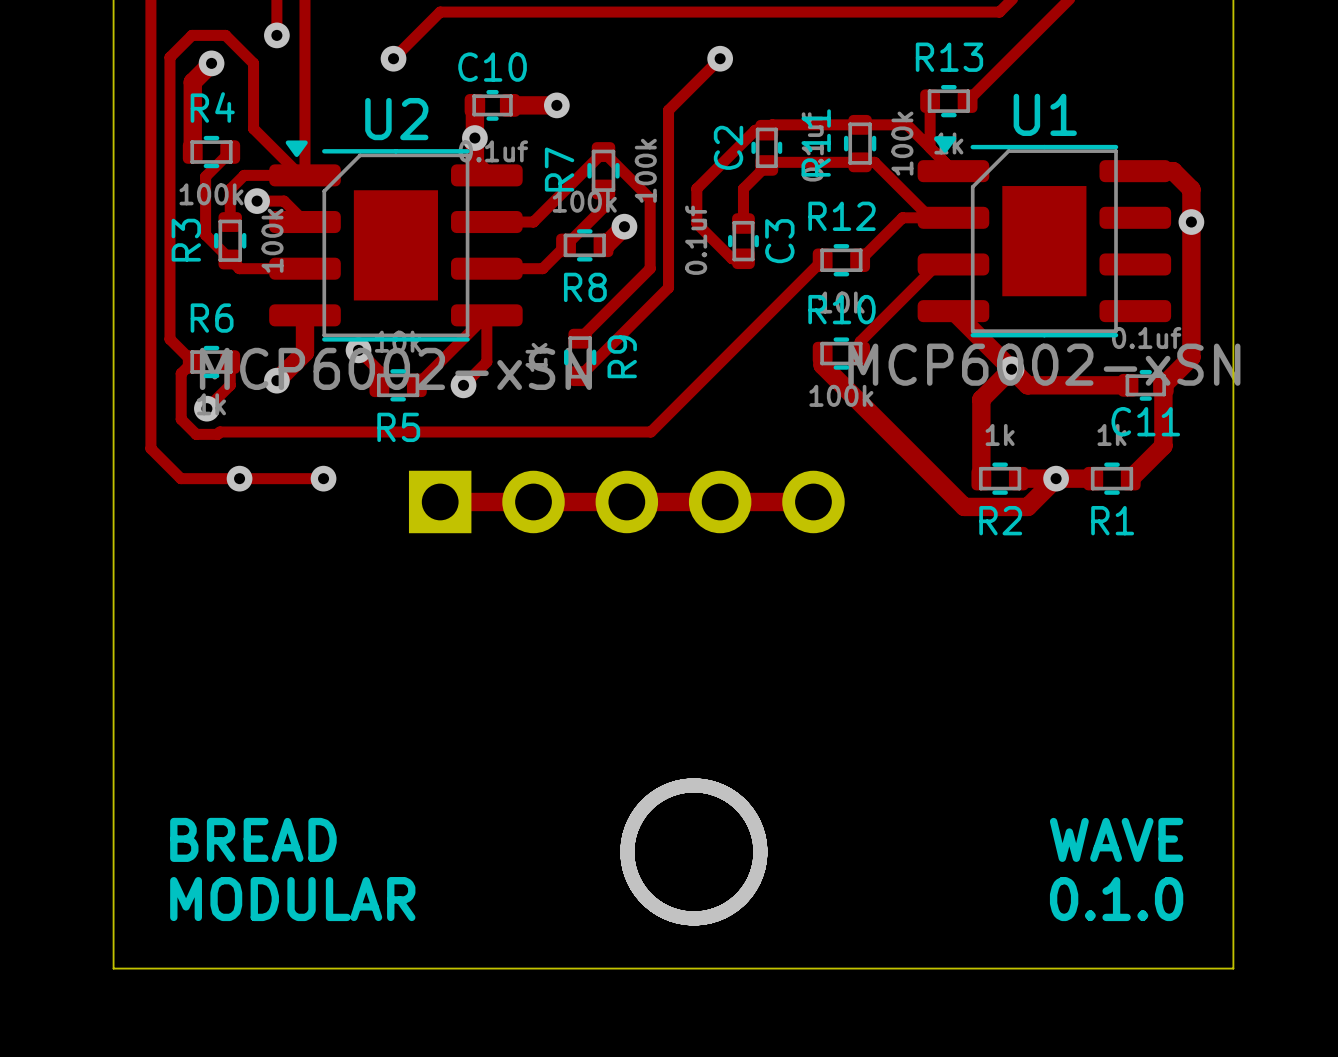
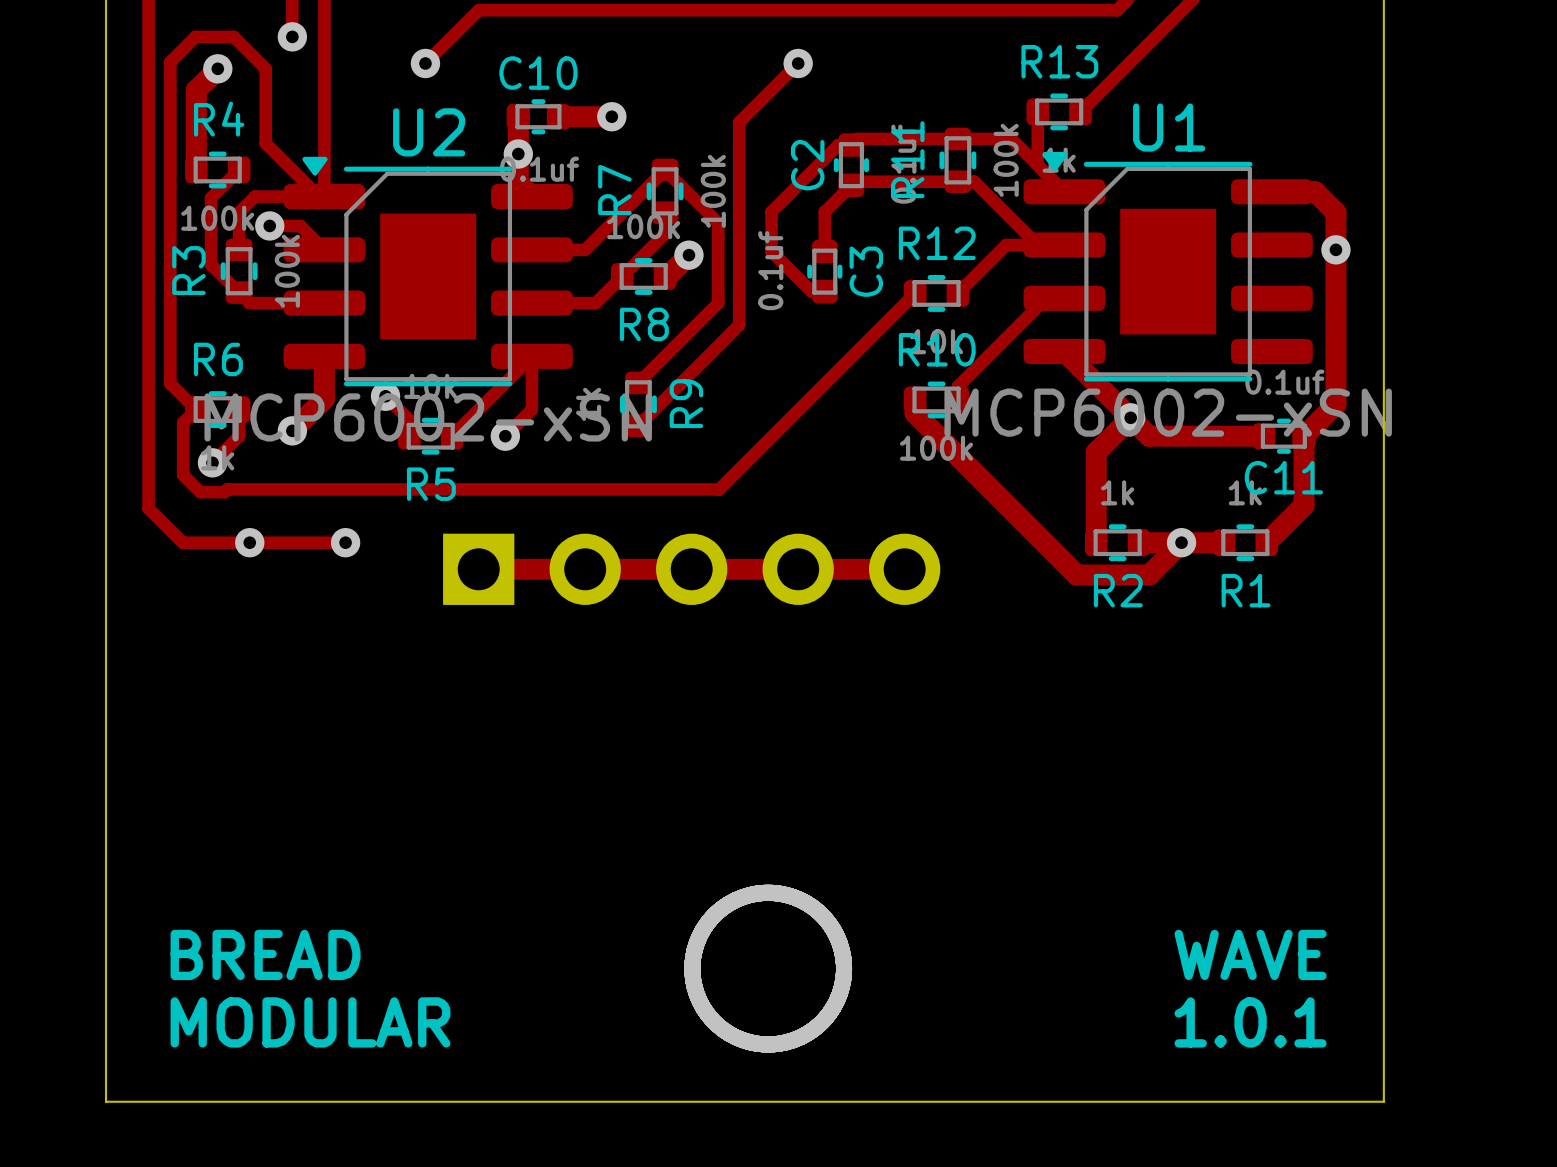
text: 0.1.0 (1116, 899) -> 1.0.1 (1250, 1022)

